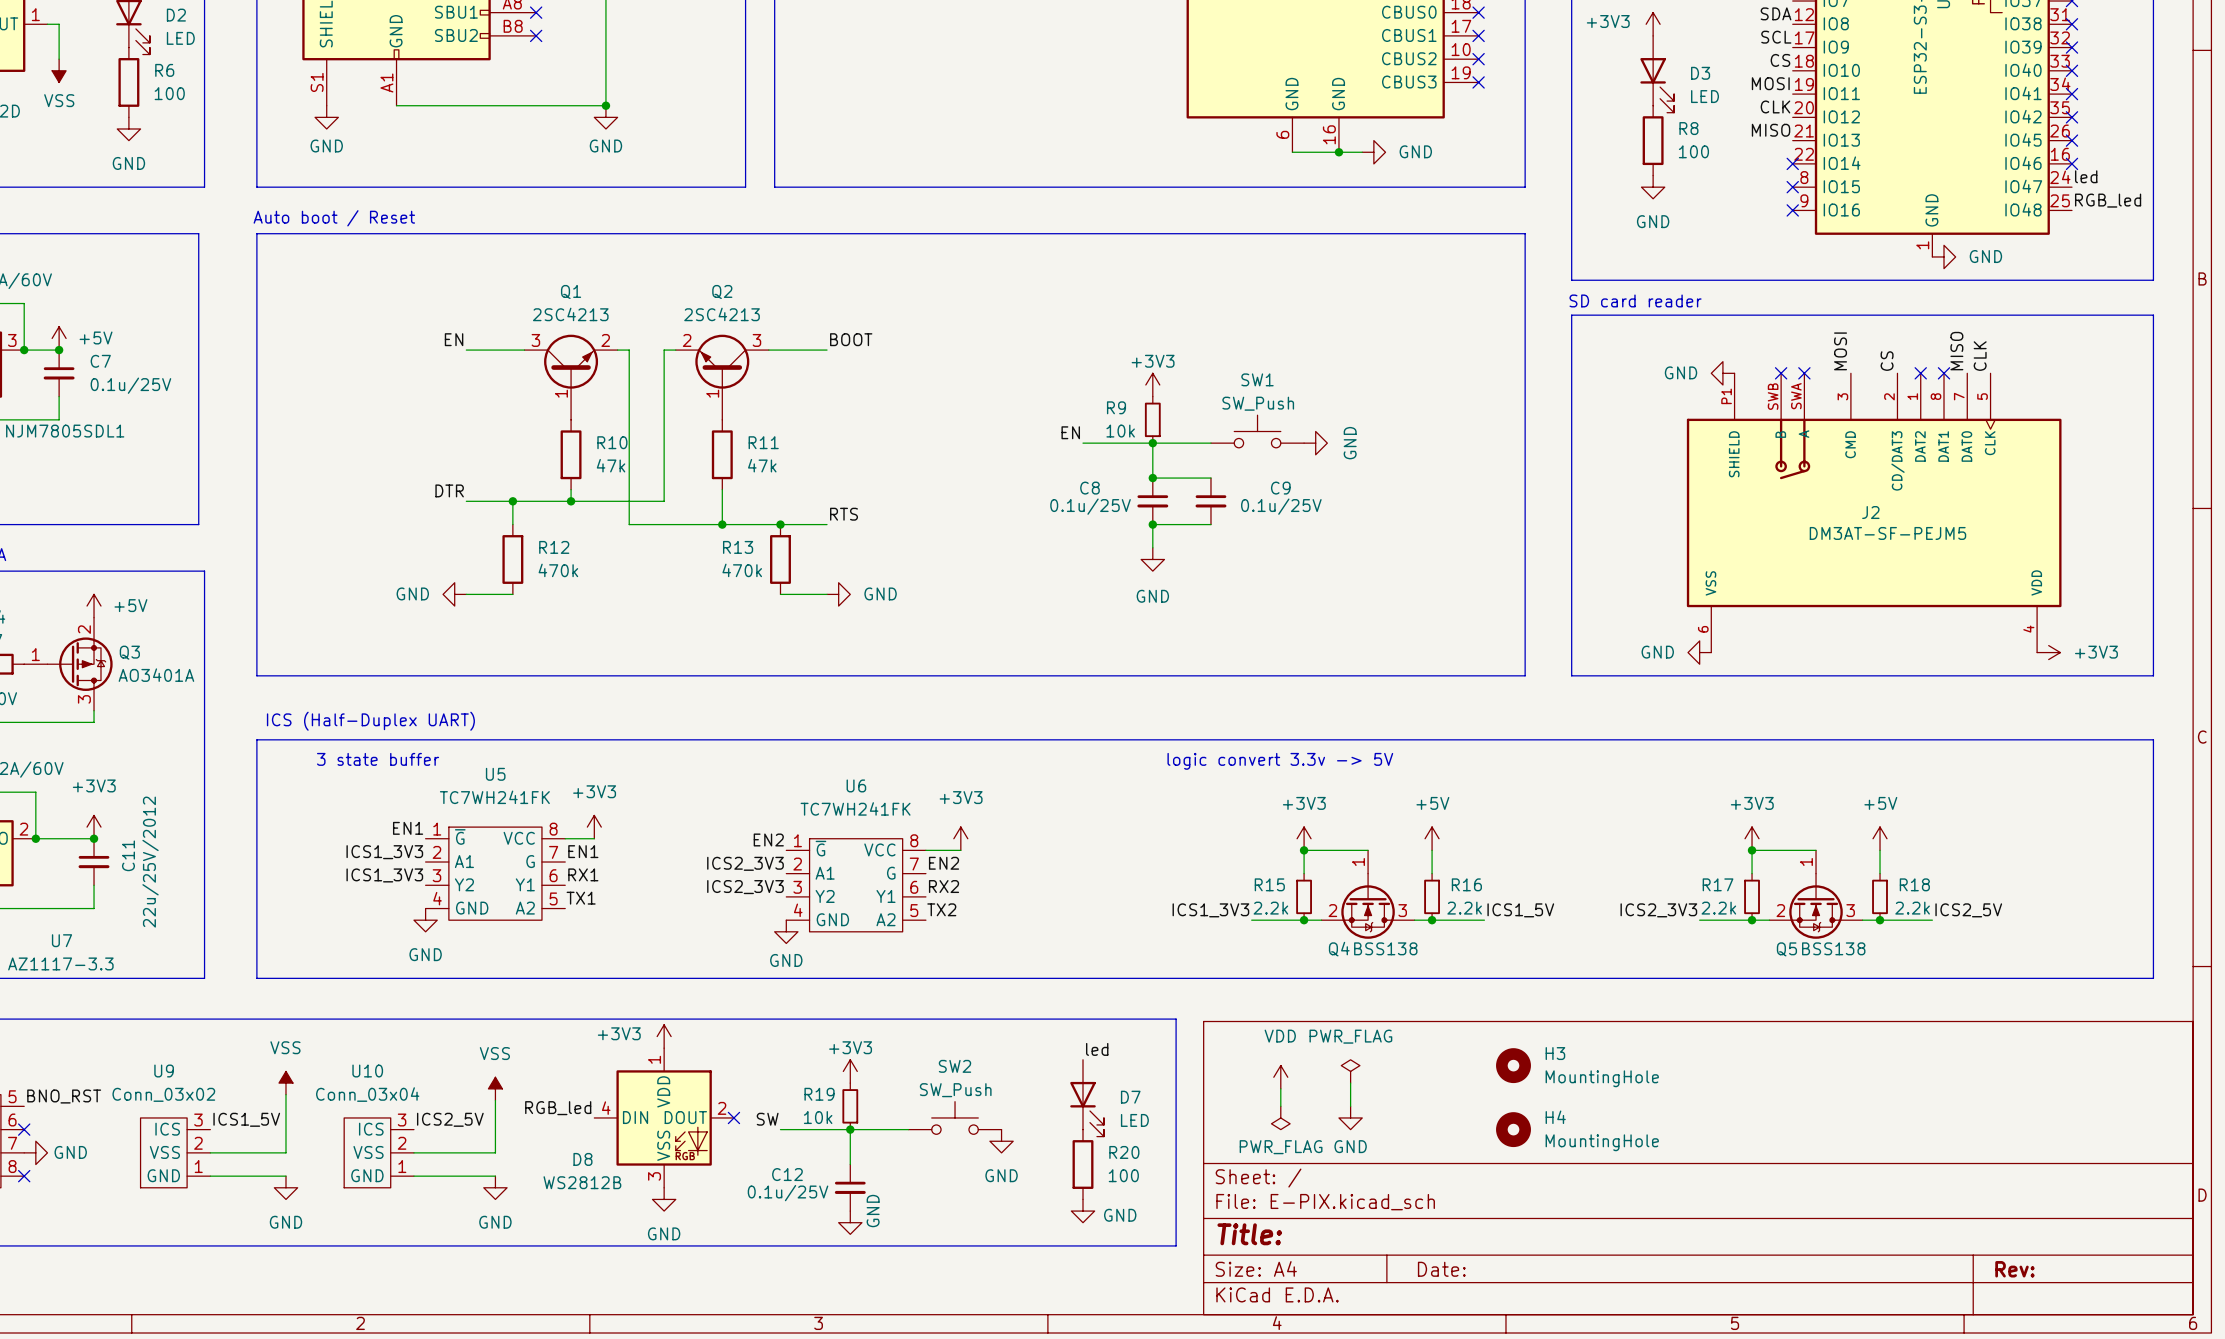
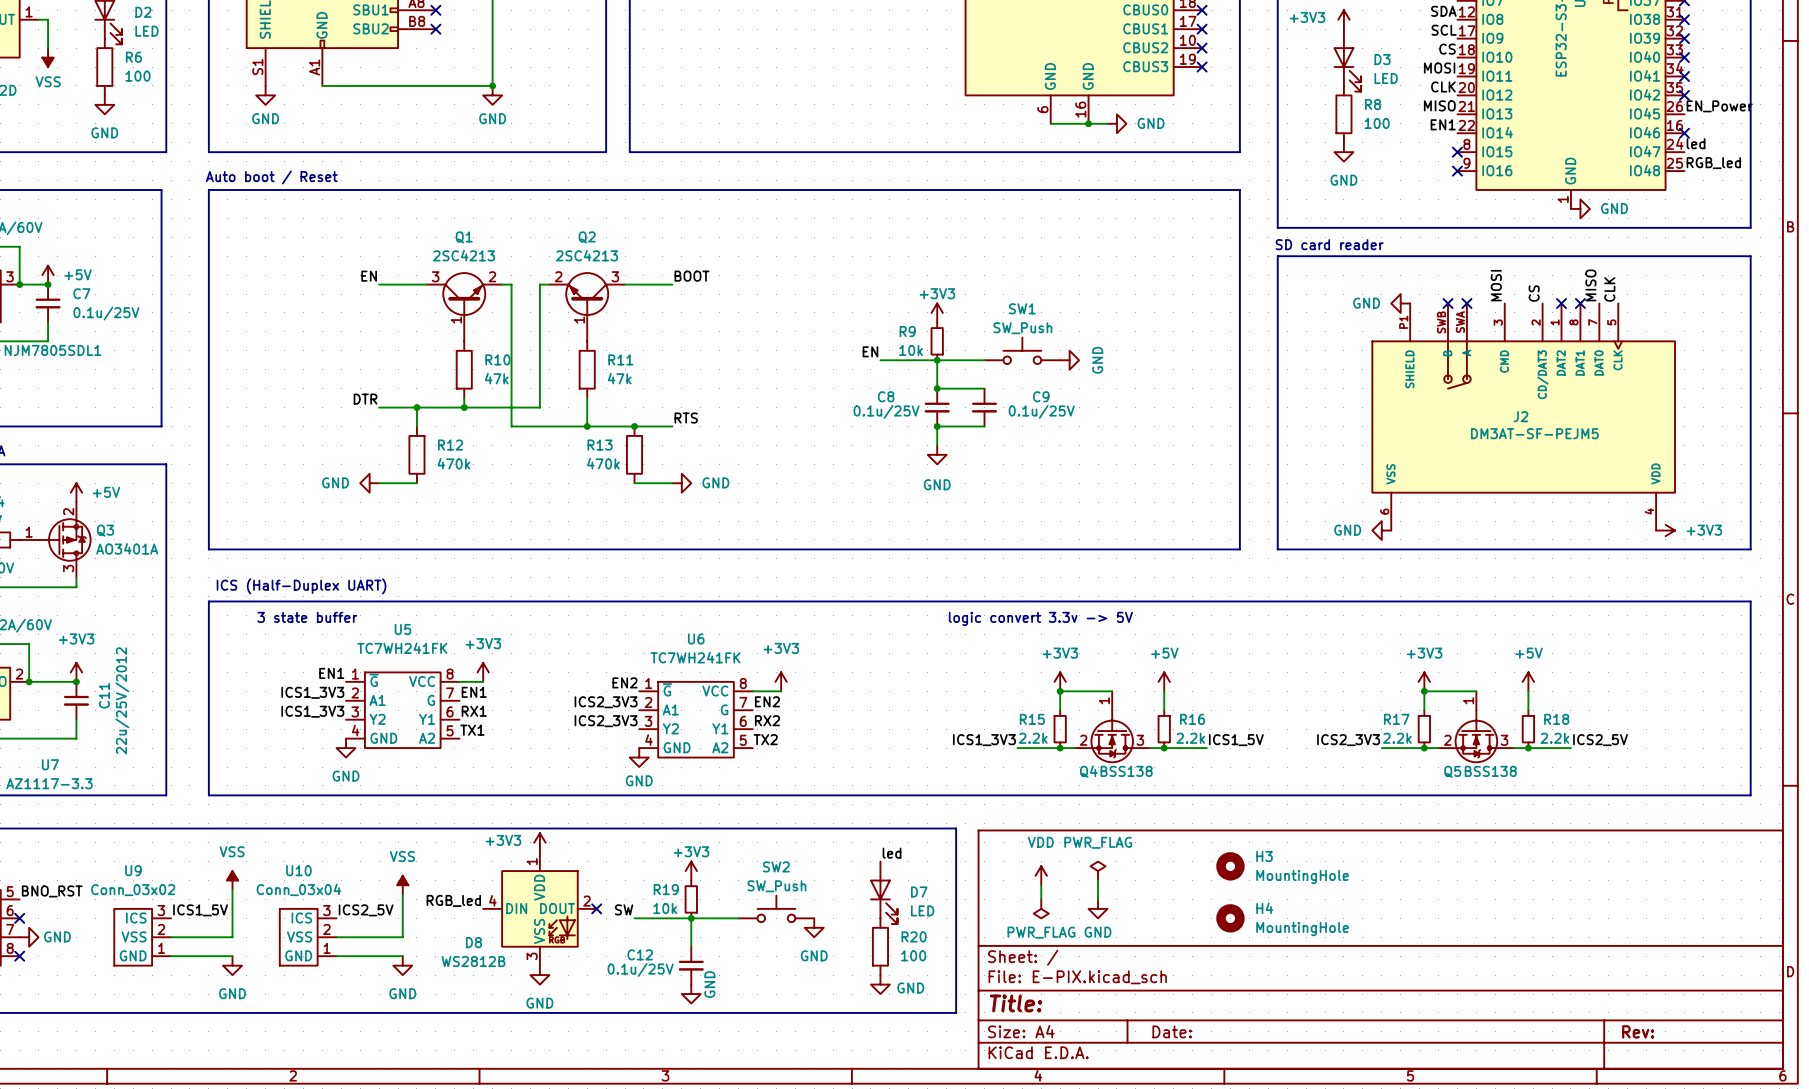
label: none -> EN_Power (1719, 106)
no-connect mark: (2071, 140) -> none
label: none -> EN1 (1443, 124)
no-connect mark: (1792, 163) -> none

